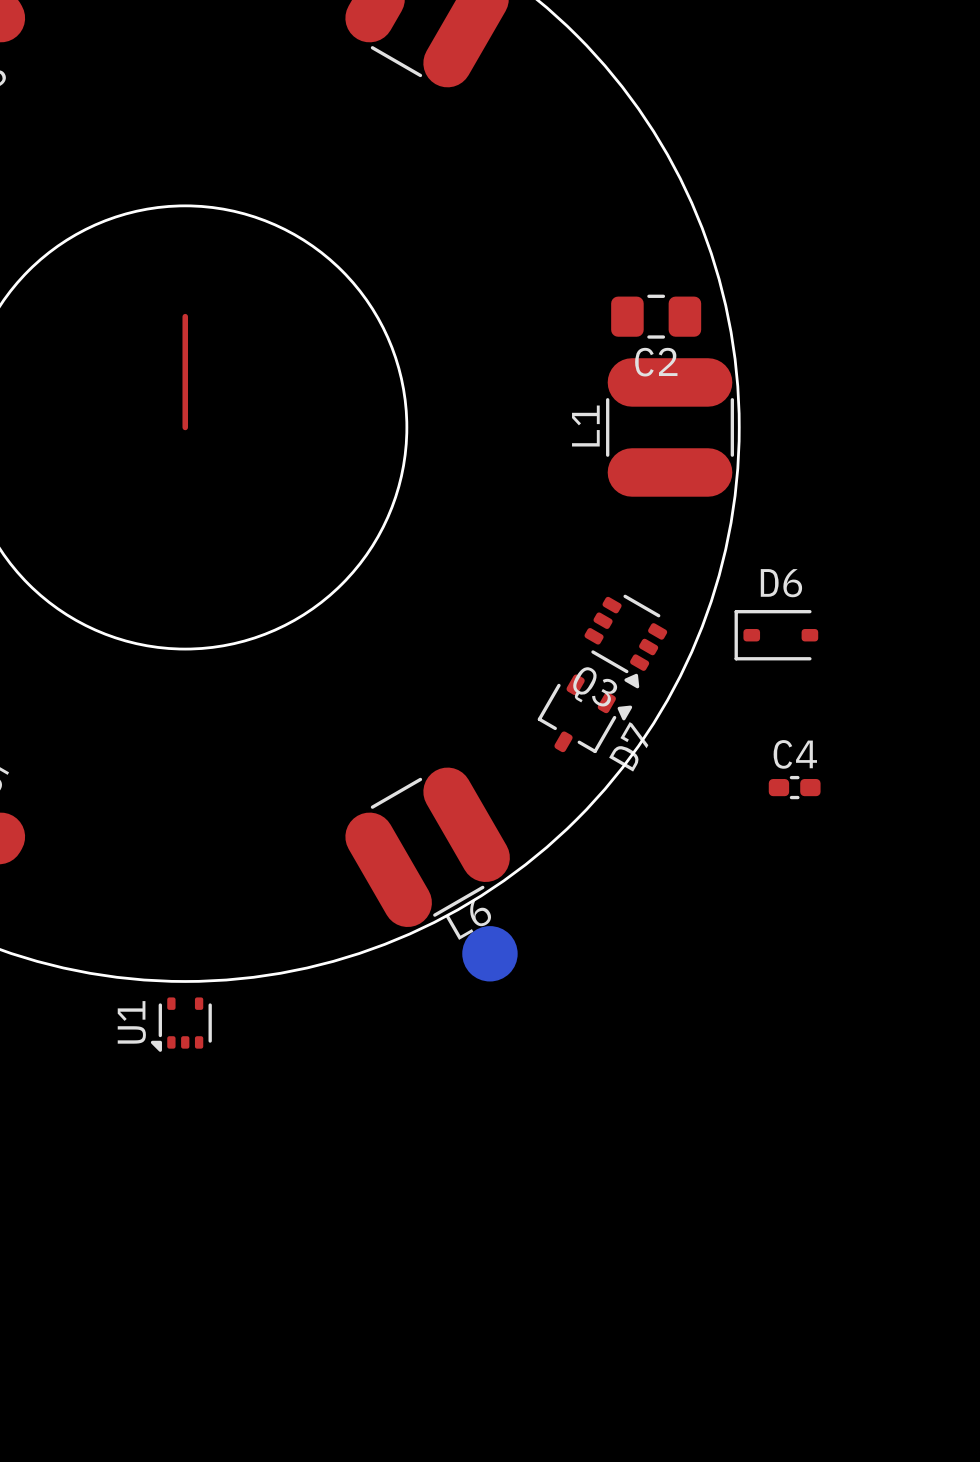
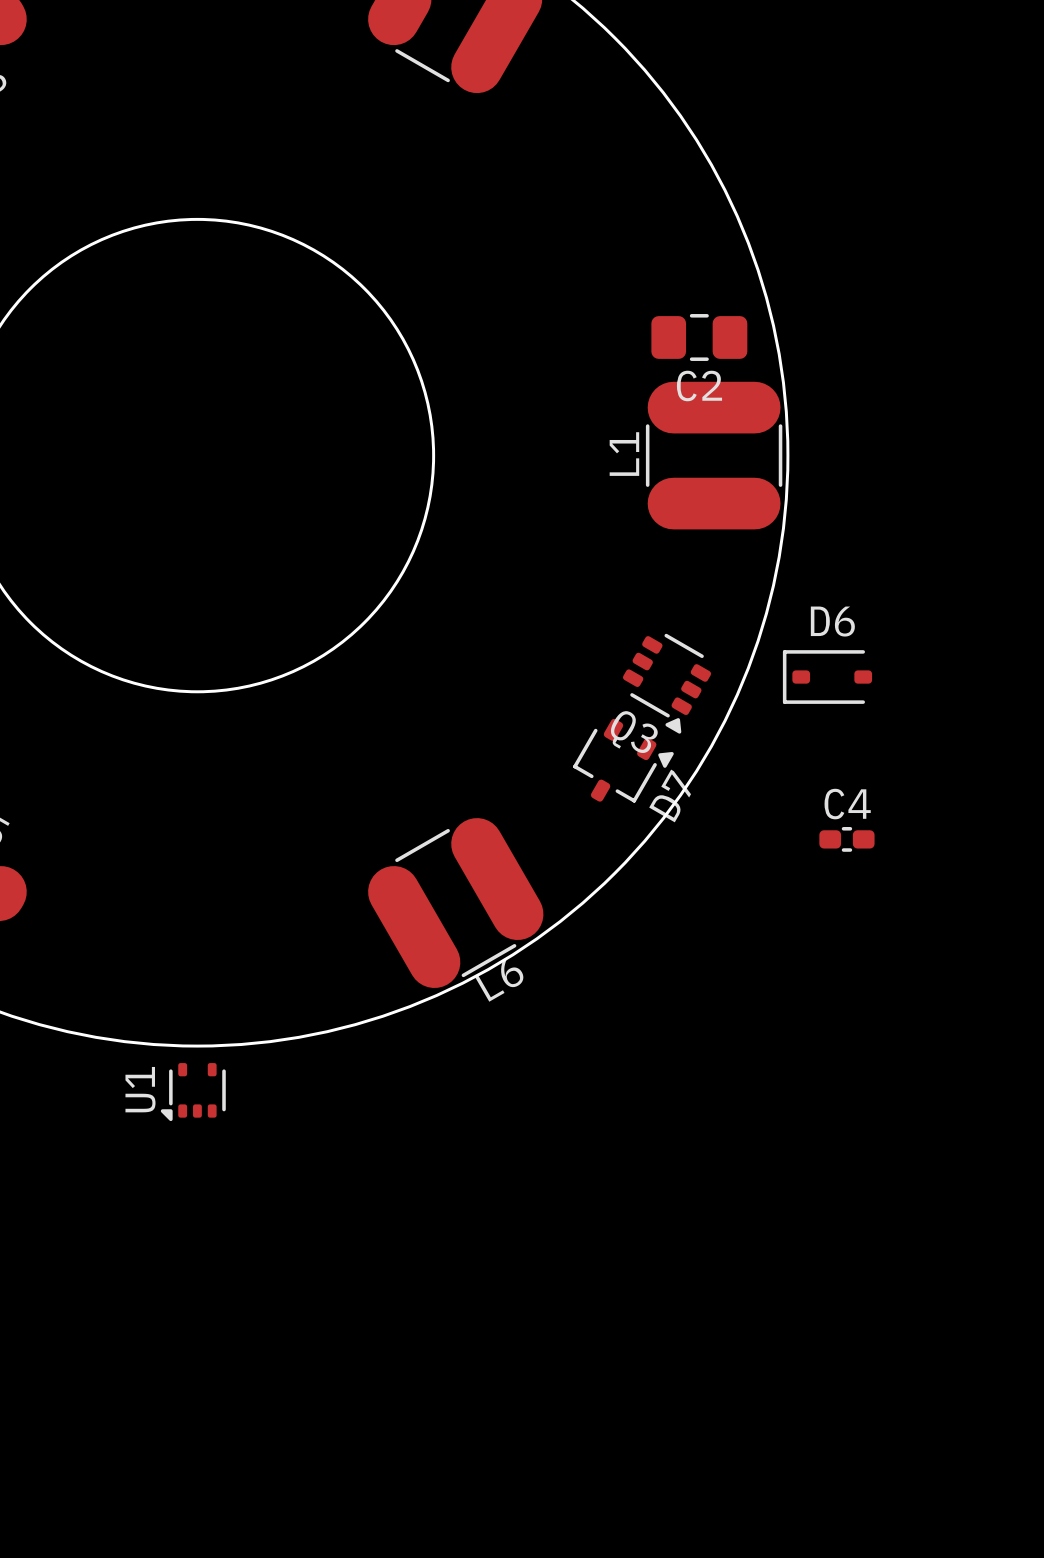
top track: (185, 316) (185, 427) -> none
part: (489, 953) -> none

